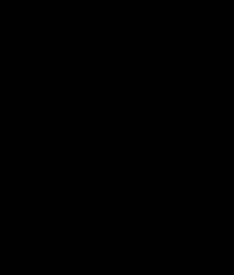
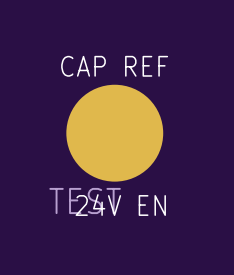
text: none -> CAP REF (114, 66)
part: none -> TEST (114, 133)
text: none -> 24V EN (120, 205)

